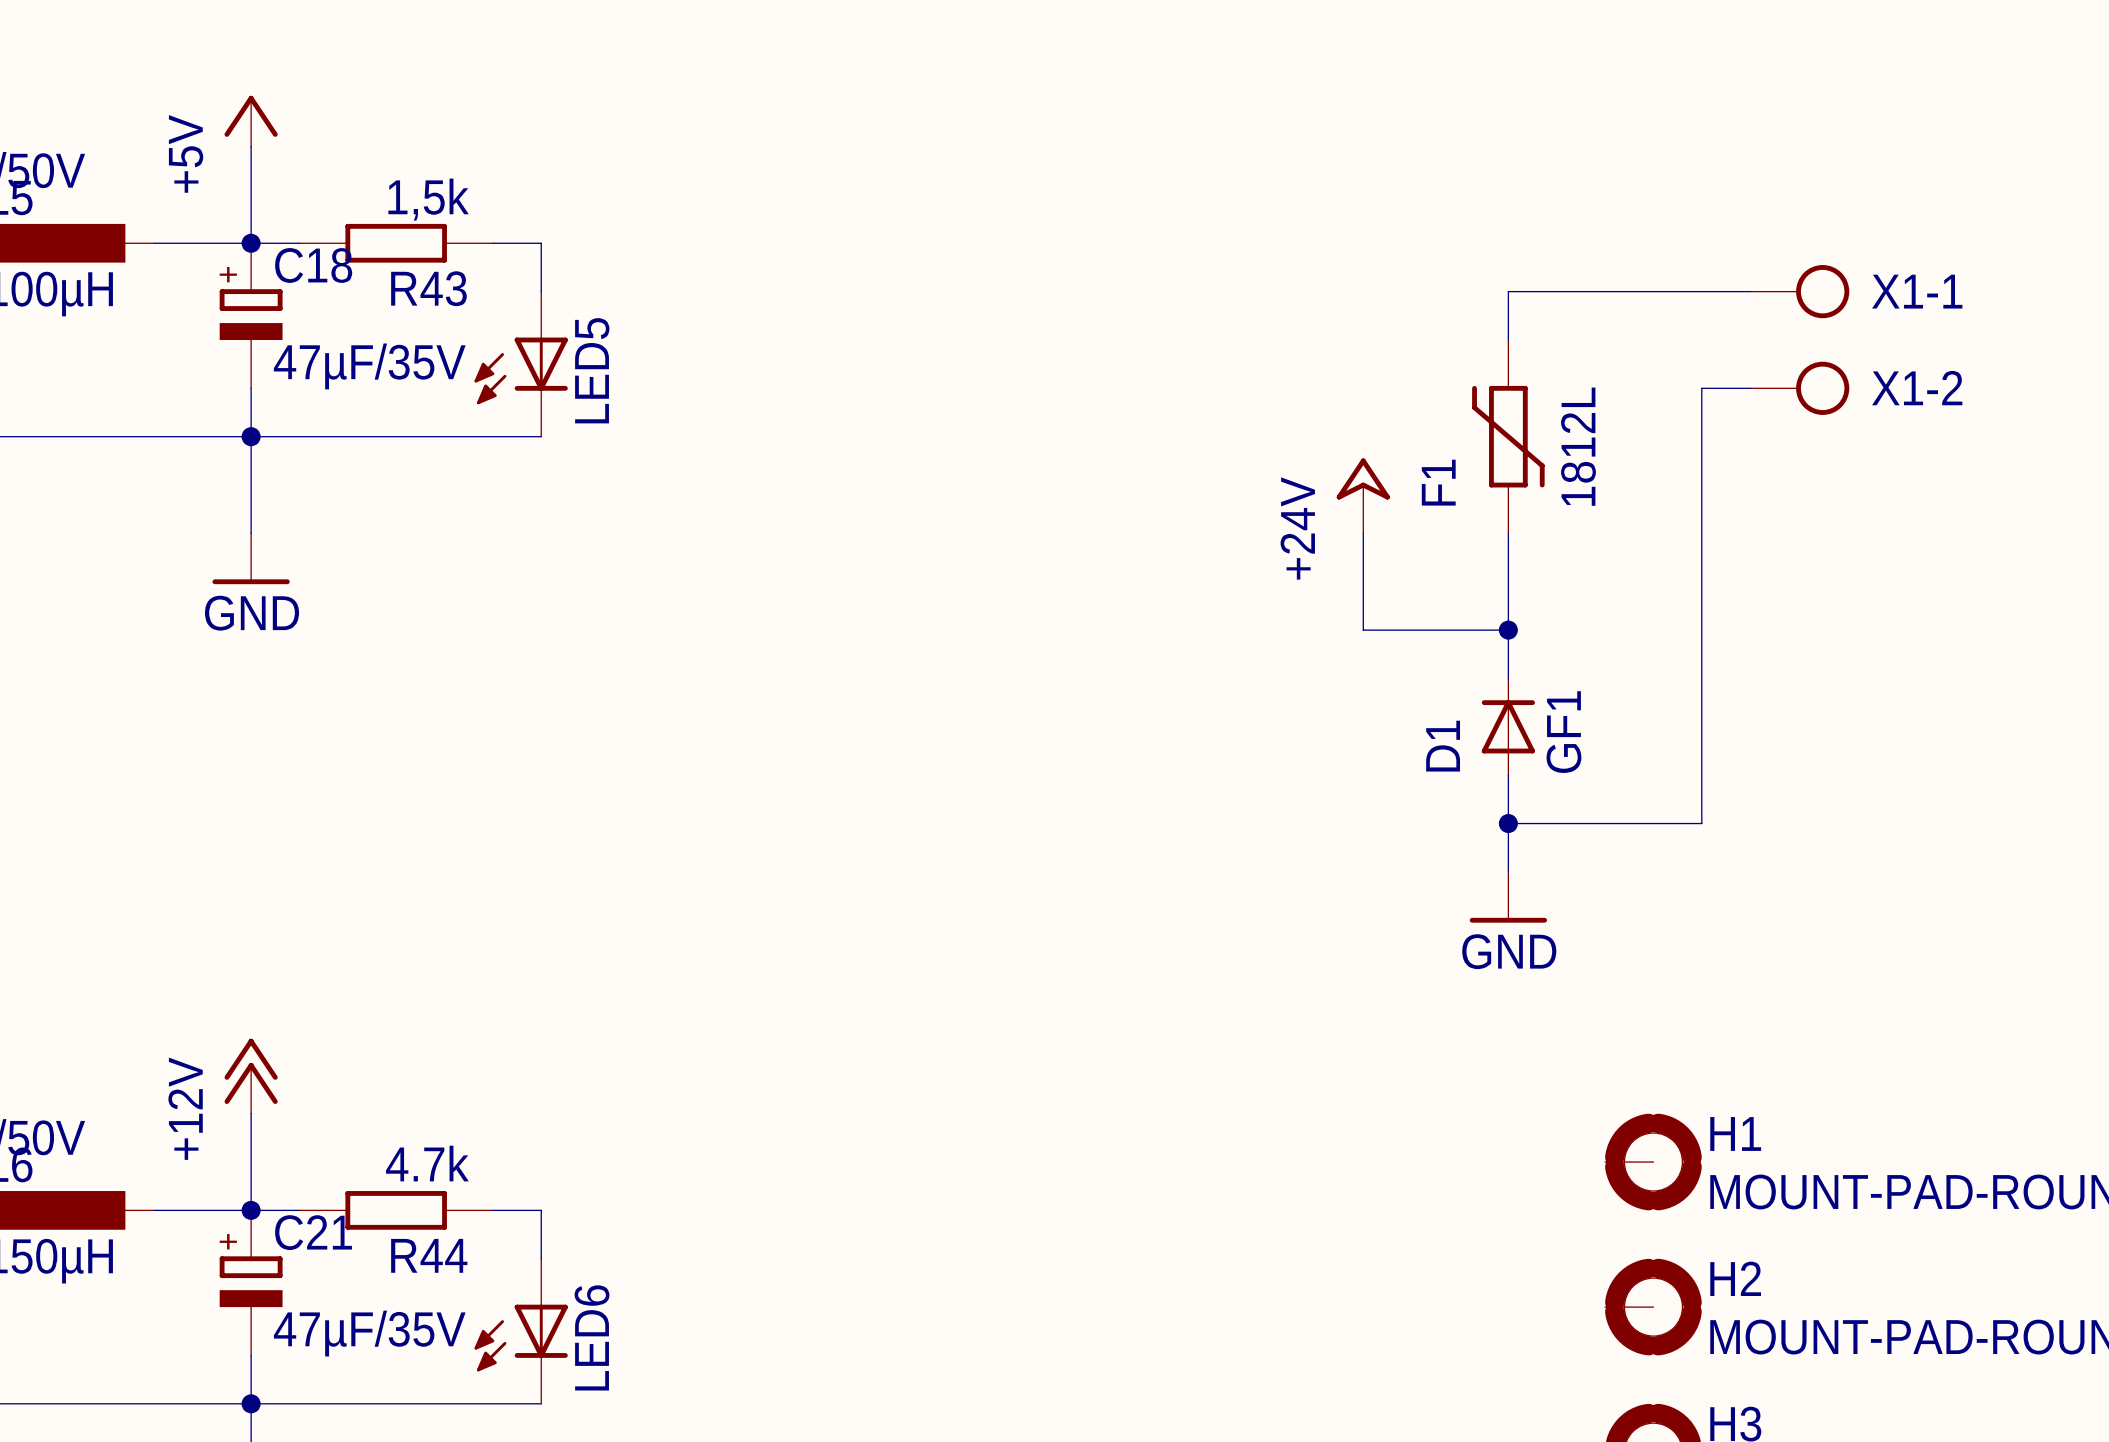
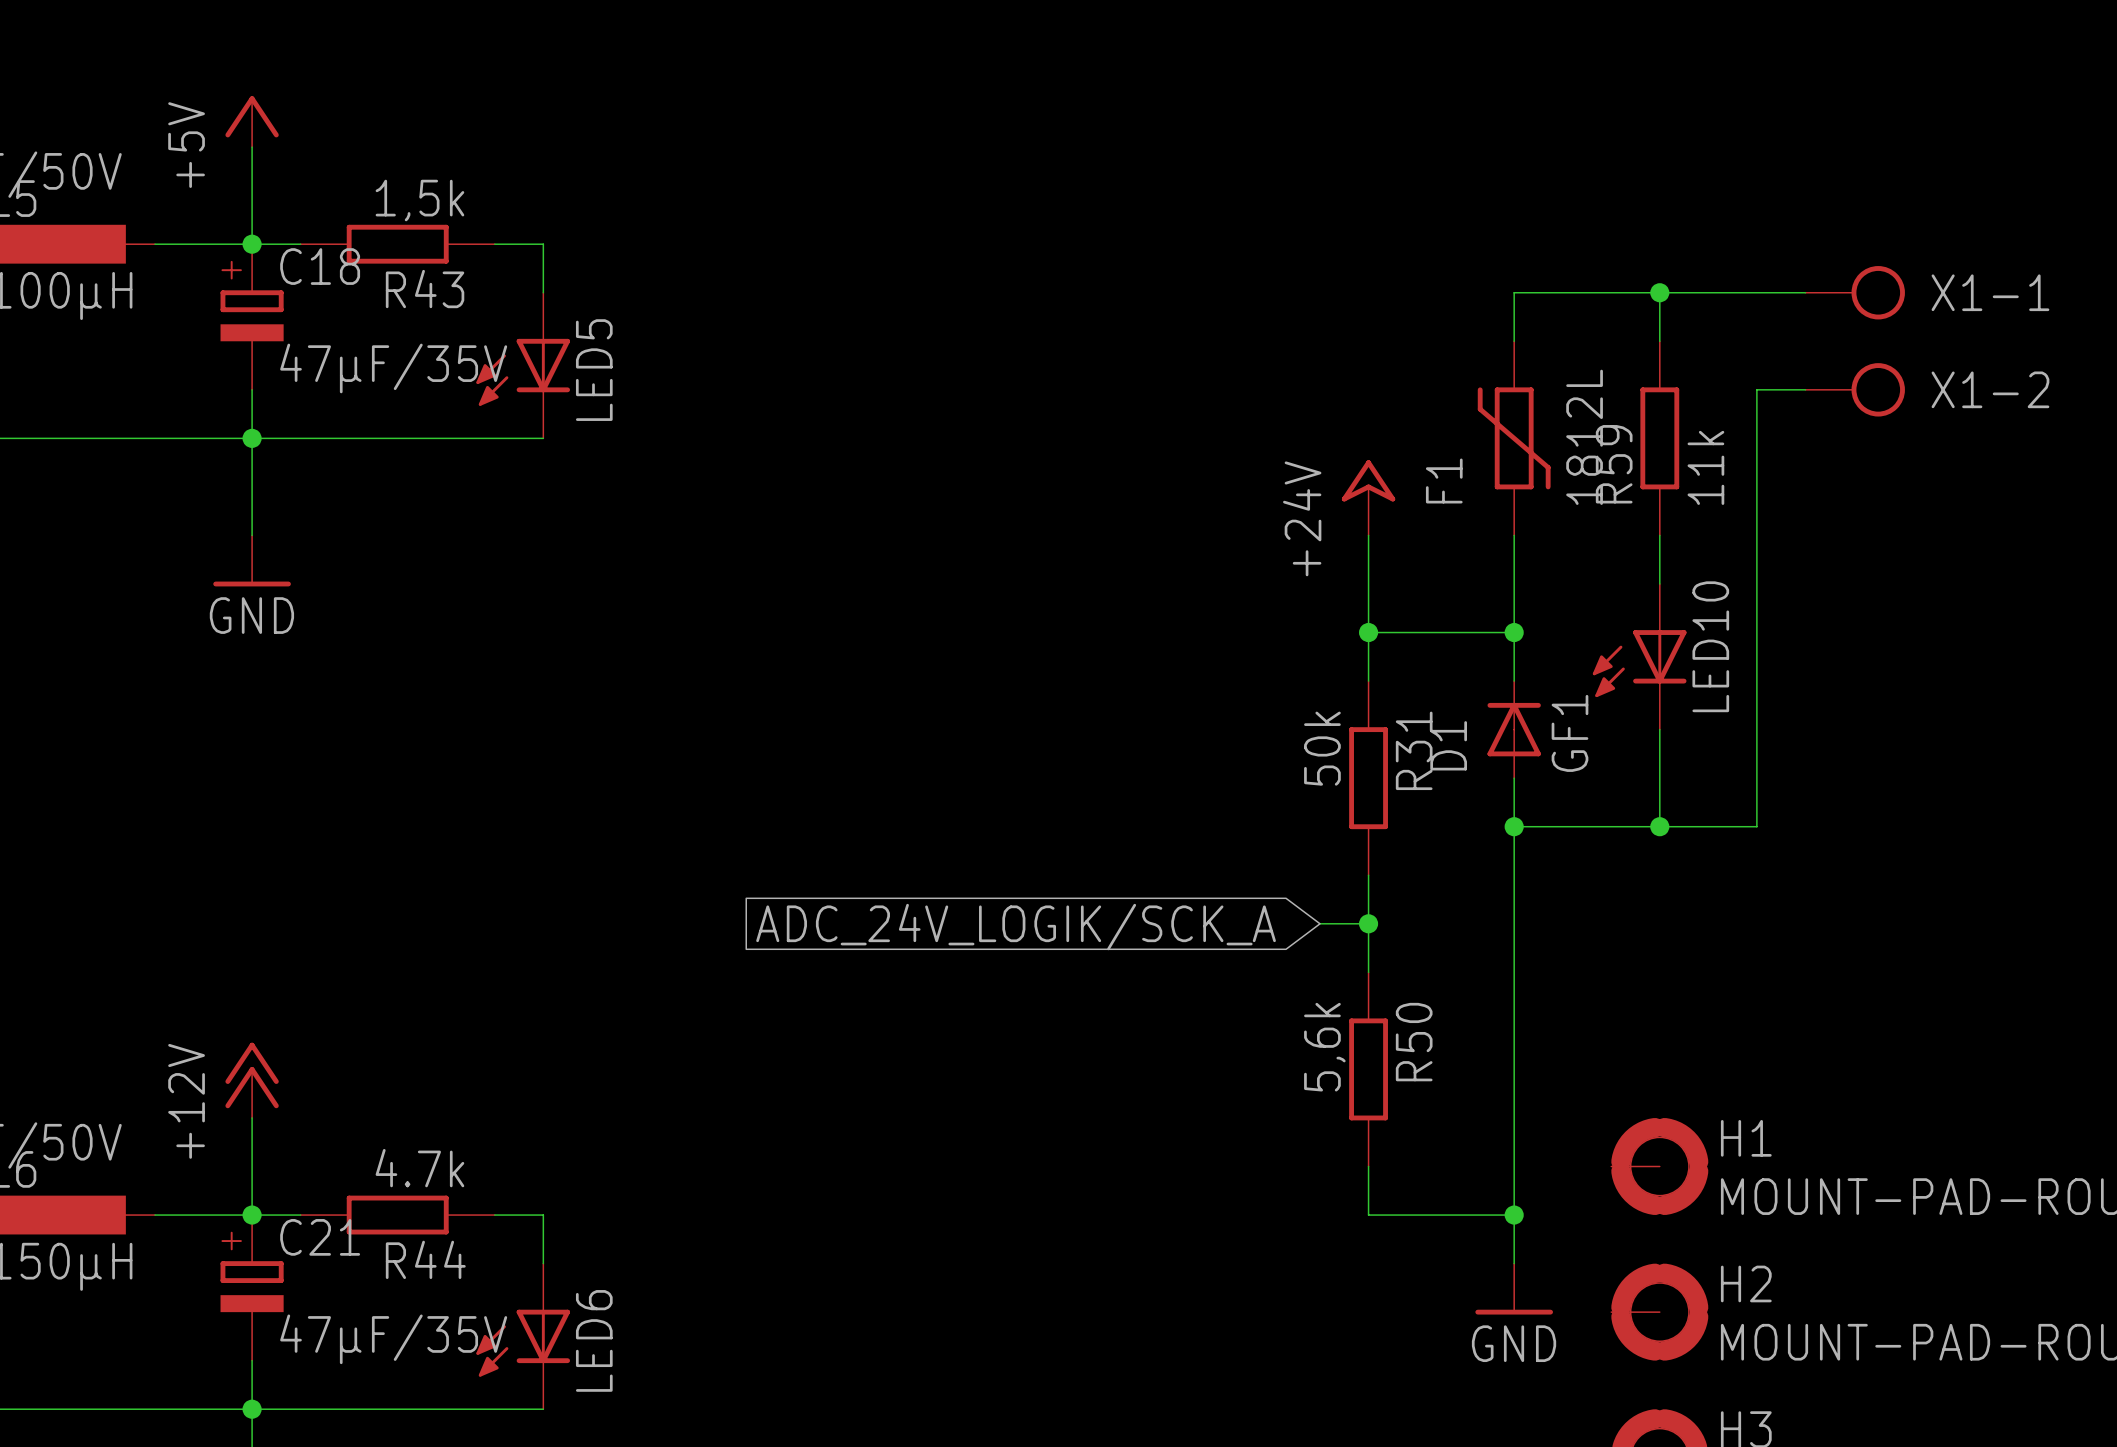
wire: none -> (1659, 292) (1659, 341)
junction: none -> (1659, 292)
X1-1 position: (1799, 291) -> (1855, 292)
wire: (1750, 388) (1701, 388) (1701, 823) -> (1805, 389) (1756, 389) (1756, 826) (1708, 826)
X1-2 position: (1799, 388) -> (1855, 389)
R59: none -> 11k (1659, 438)
wire: none -> (1659, 535) (1659, 584)
wire: none -> (1368, 632) (1368, 681)
junction: none -> (1368, 632)
LED10: none -> (1639, 656)
wire: none -> (1659, 729) (1659, 826)
R31: none -> 50k (1368, 778)
junction: none -> (1659, 826)
wire: none -> (1368, 875) (1368, 972)
wire: none -> (1514, 875) (1514, 1263)
power symbol position: GND (1508, 897) -> GND (1514, 1289)
wire: none -> (1320, 923) (1368, 923)
junction: none -> (1368, 923)
global label: none -> ADC_24V_LOGIK/SCK_A (1016, 927)
R50: none -> 5,6k (1368, 1069)
wire: none -> (1368, 1166) (1368, 1215) (1514, 1215)
junction: none -> (1514, 1215)

